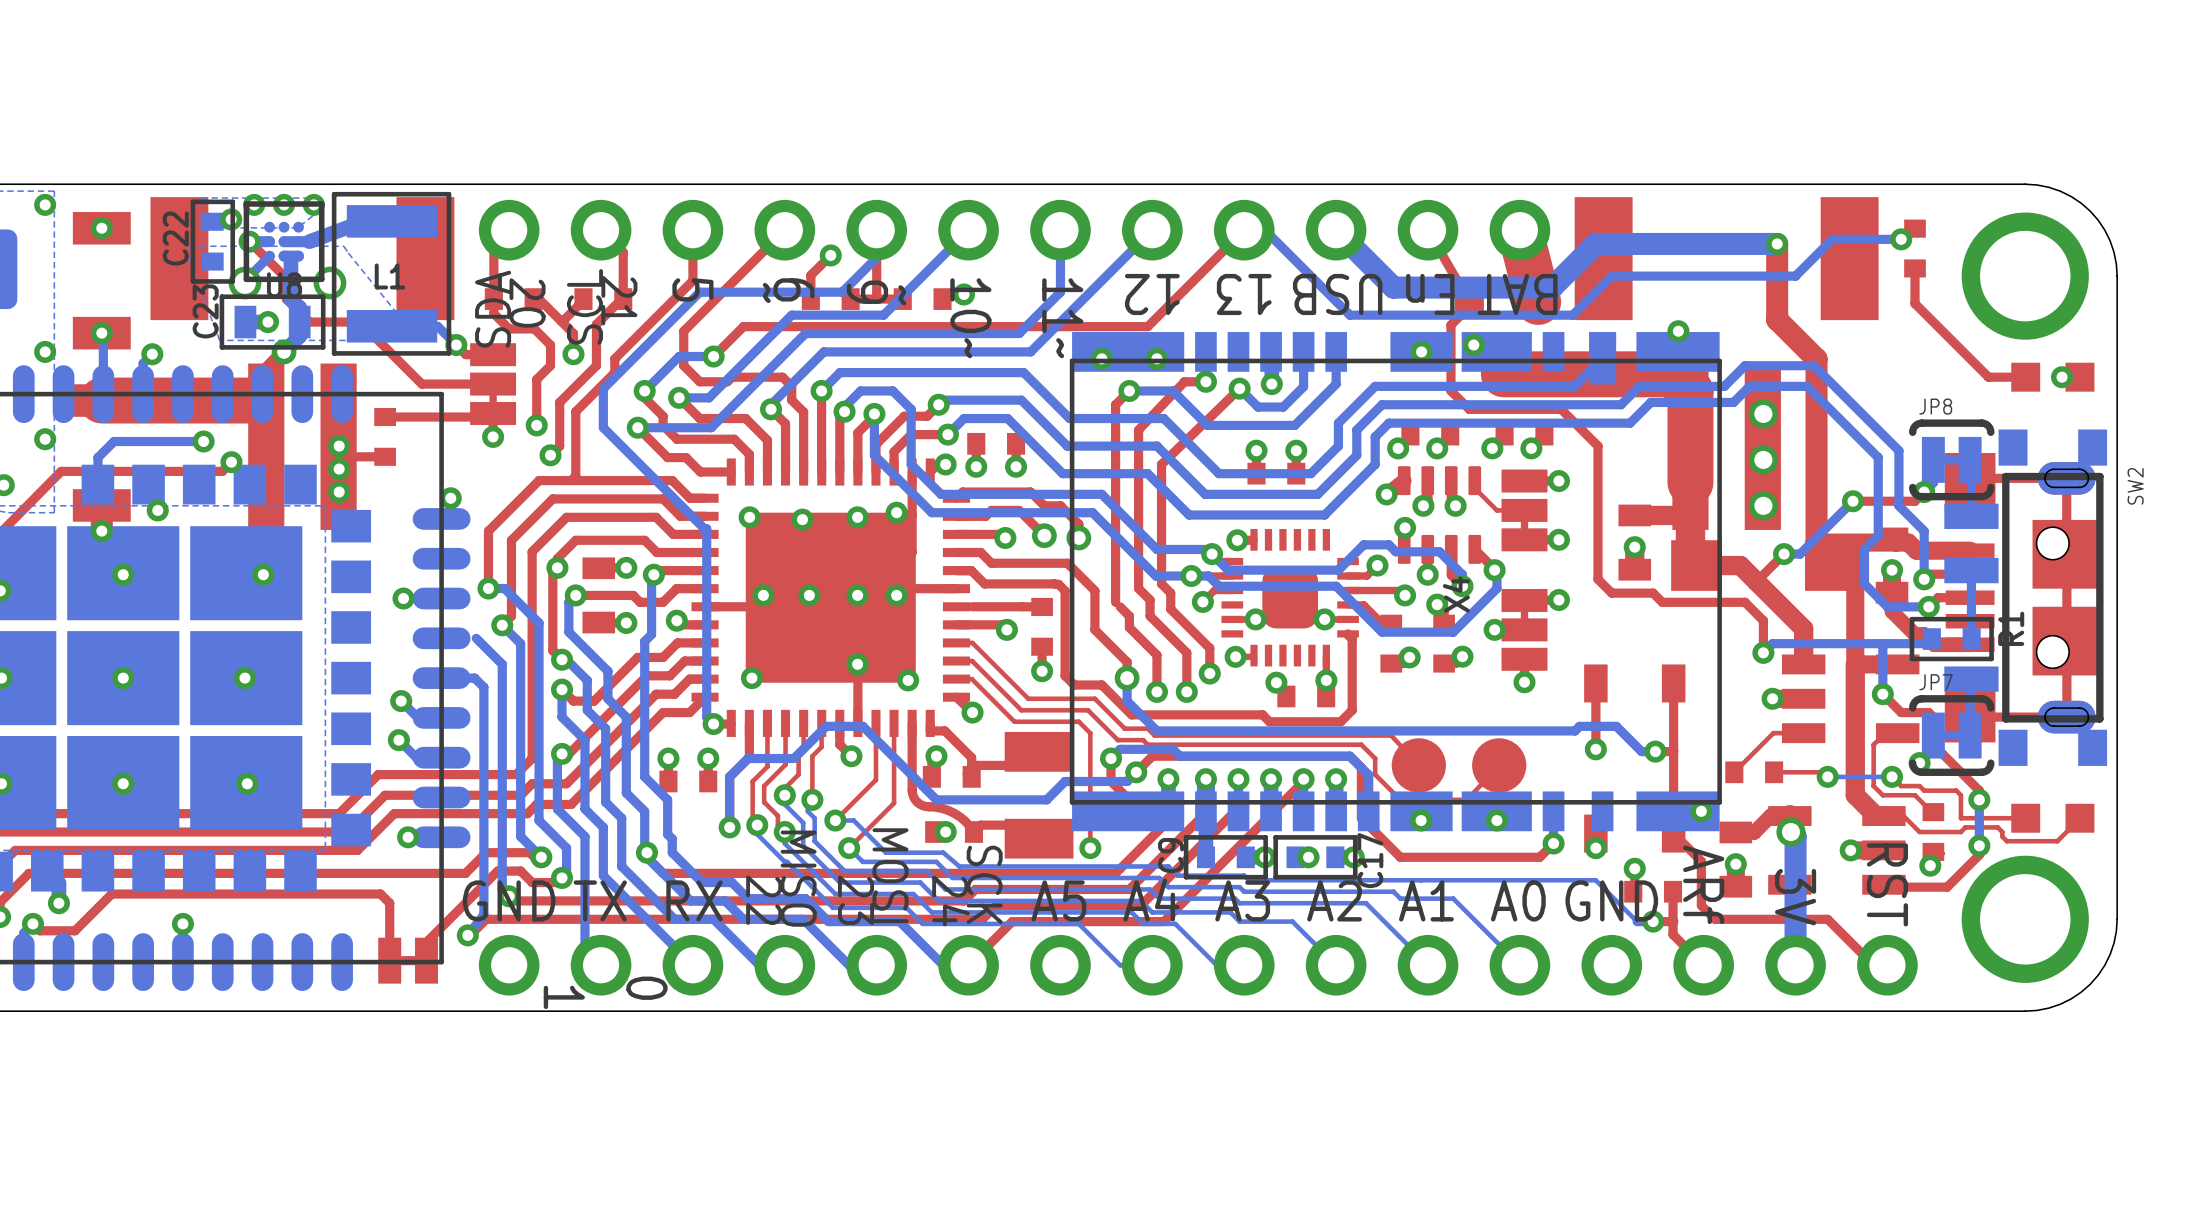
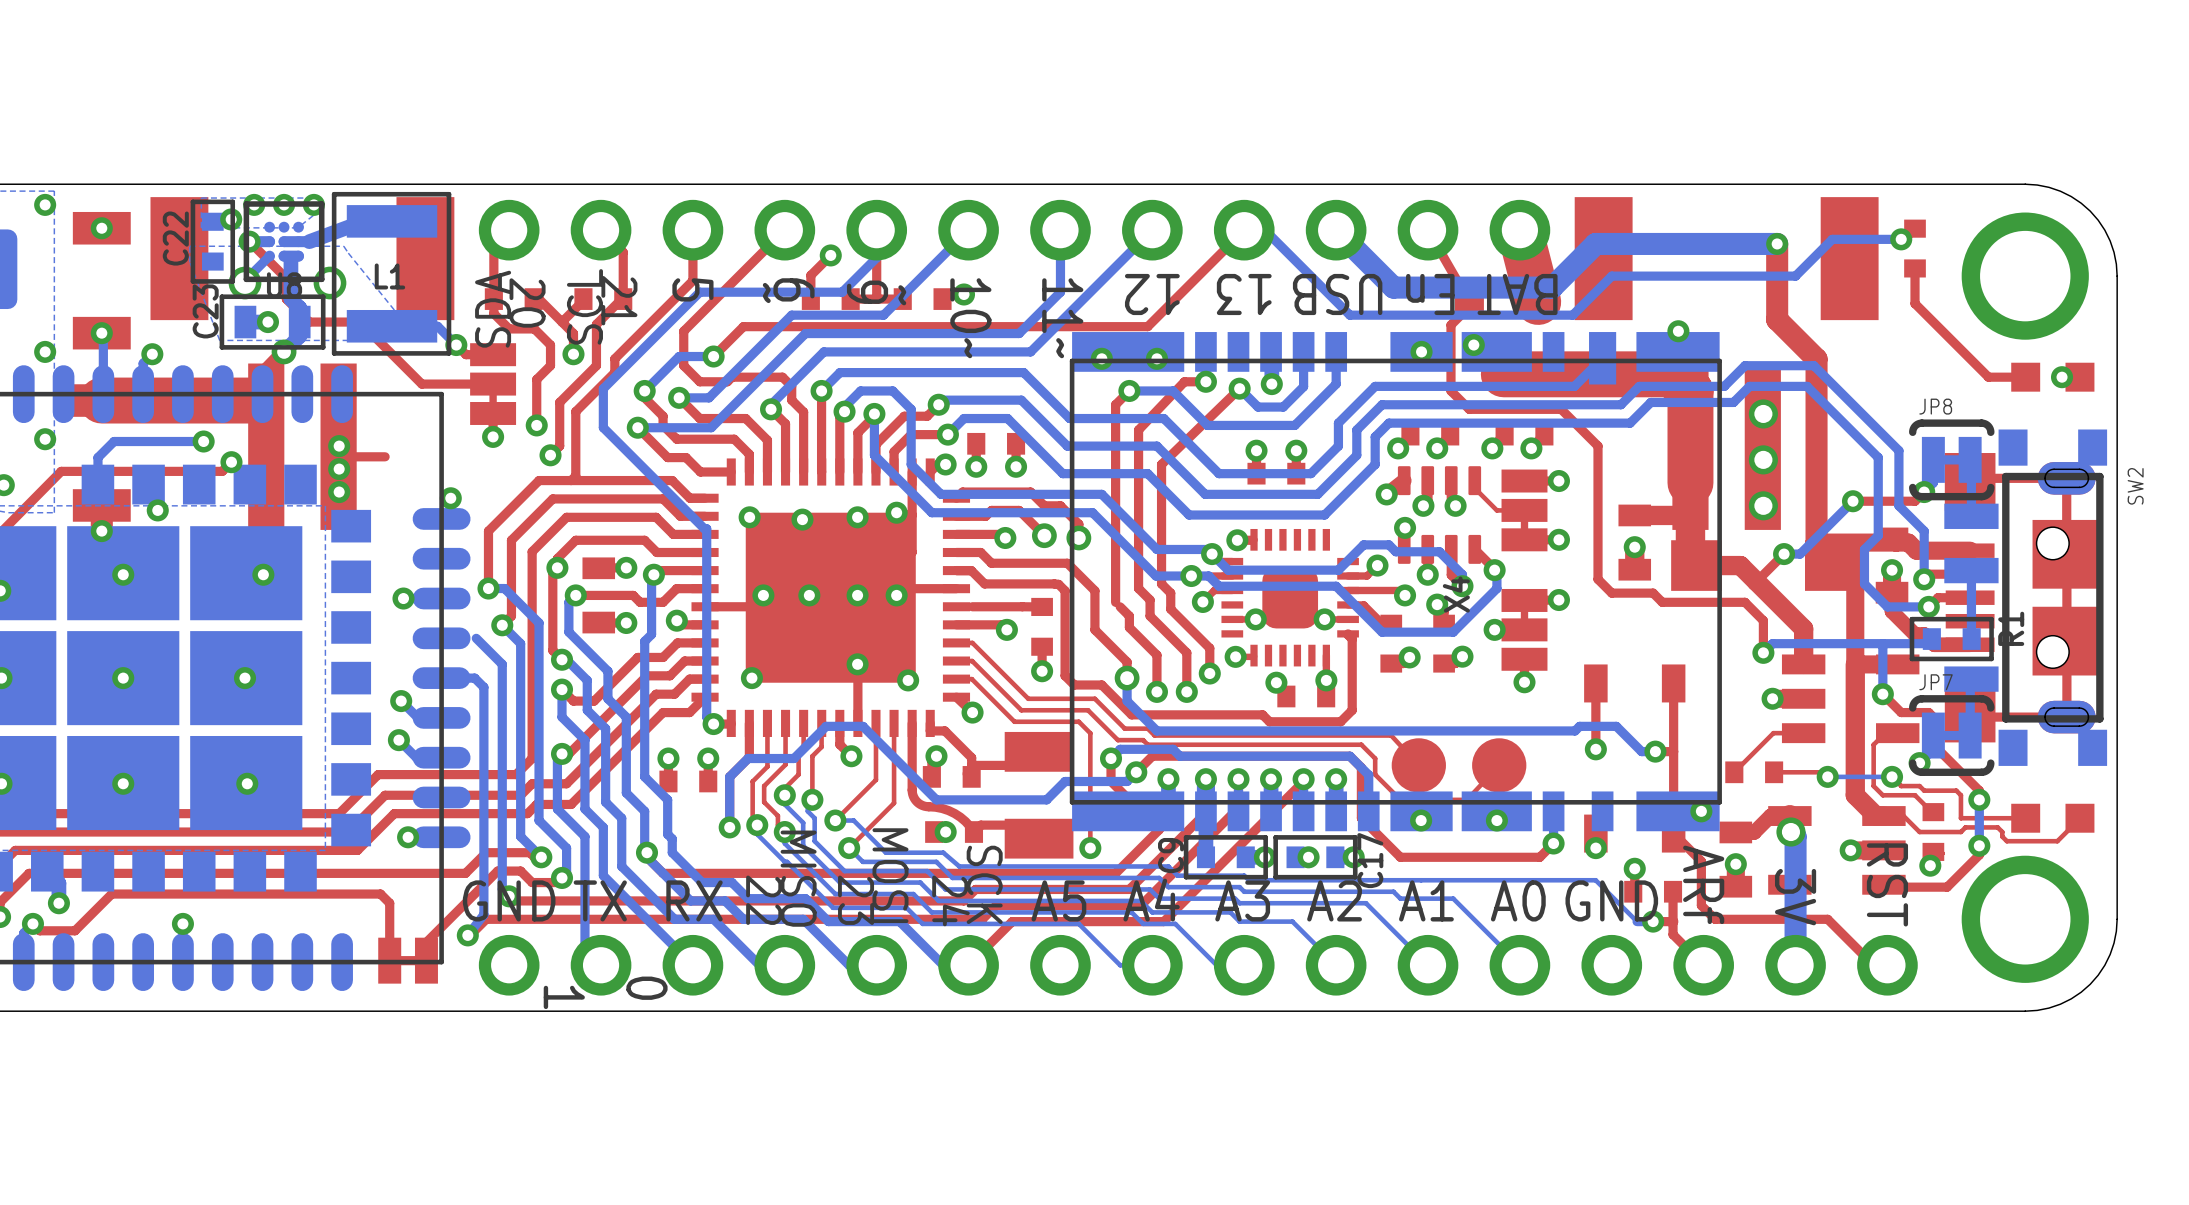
top track: (493, 417) (385, 417) -> none
part: (385, 436) -> none

